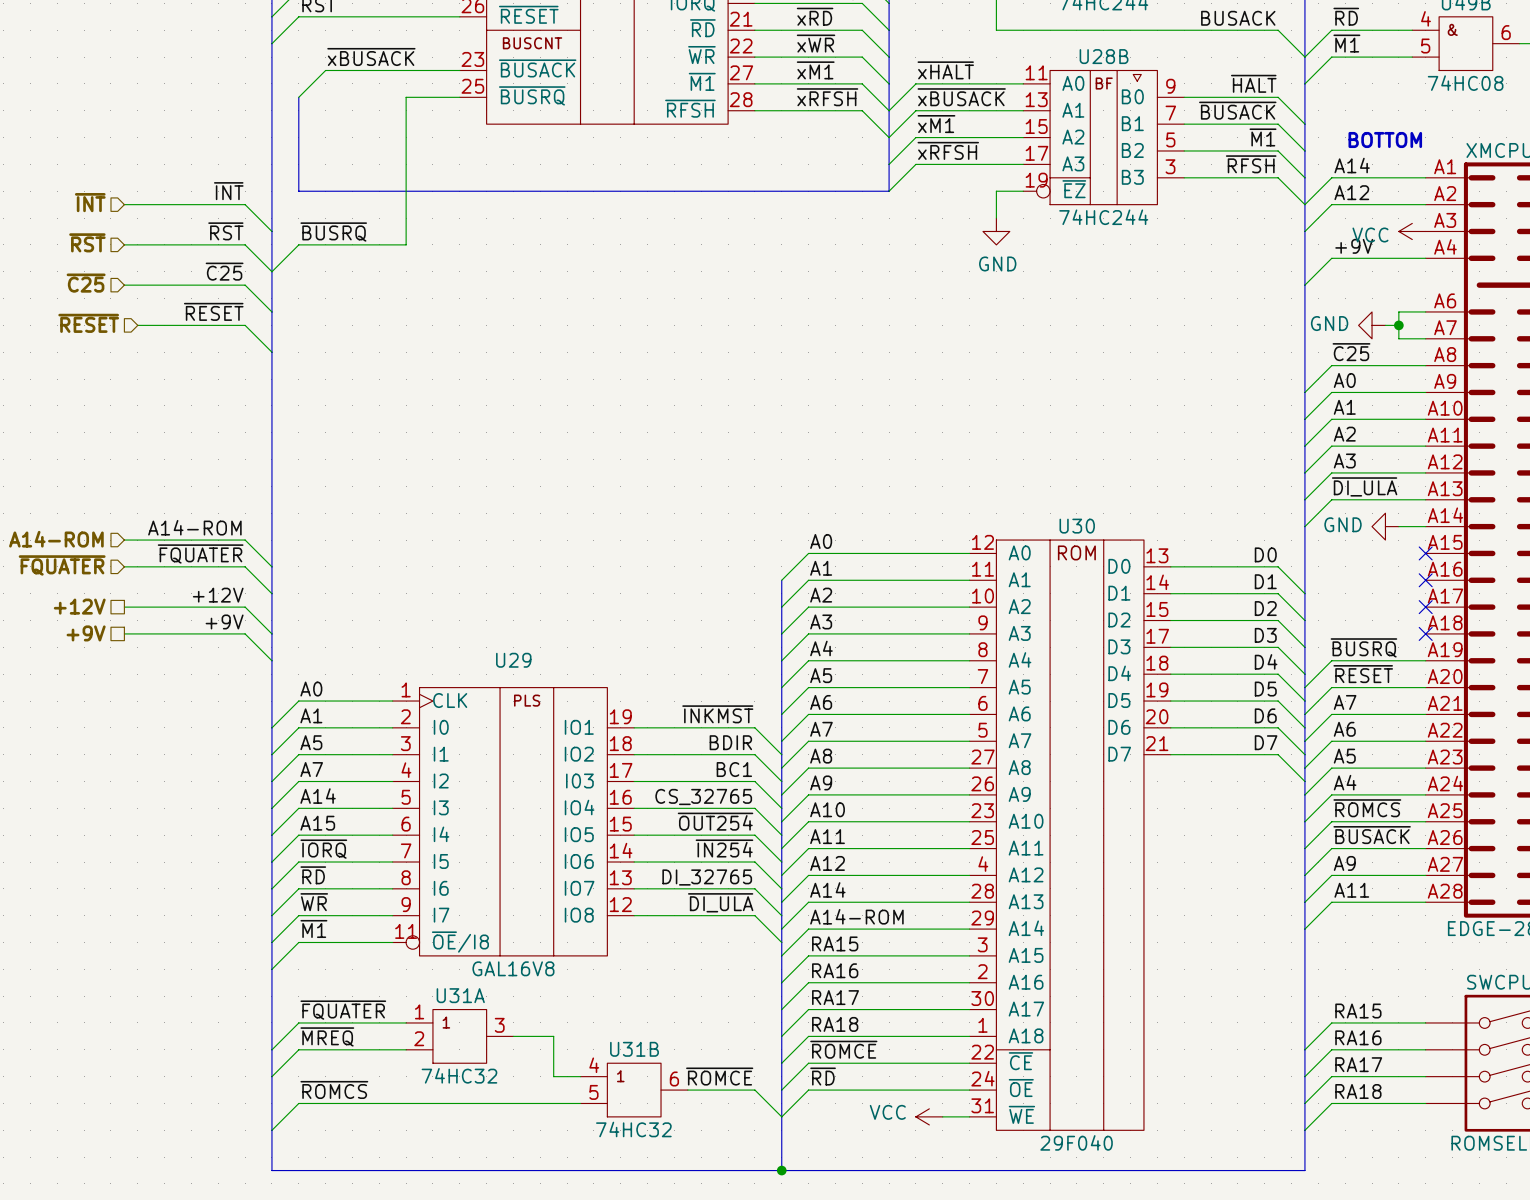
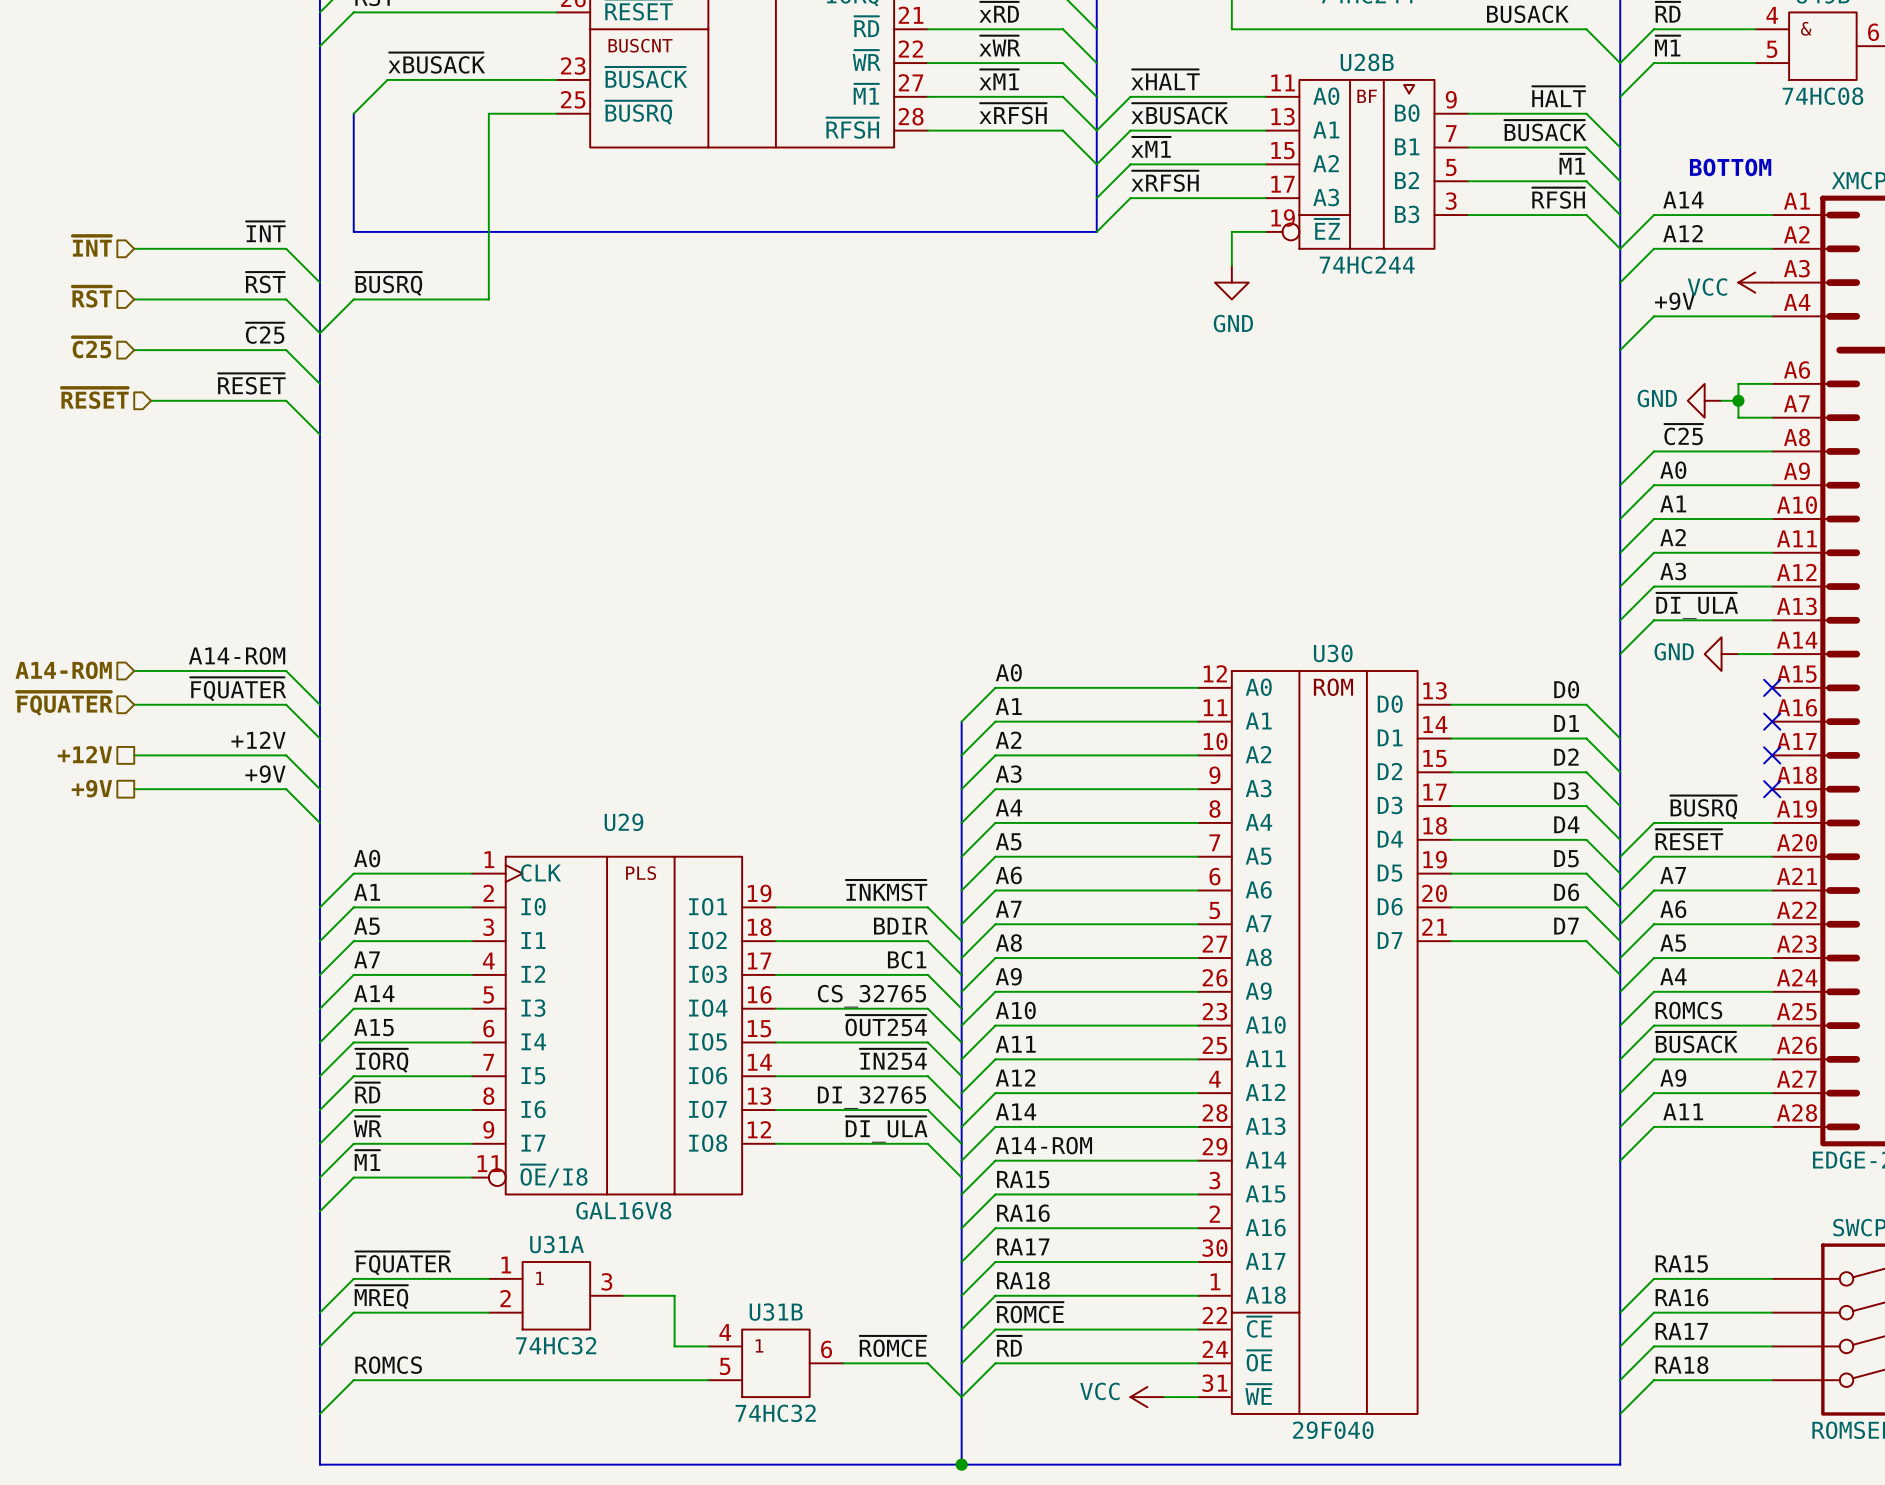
label: ~{ROMCS} (1367, 808) -> ROMCS (1688, 1010)
label: ~{ROMCS} (334, 1089) -> ROMCS (388, 1365)

